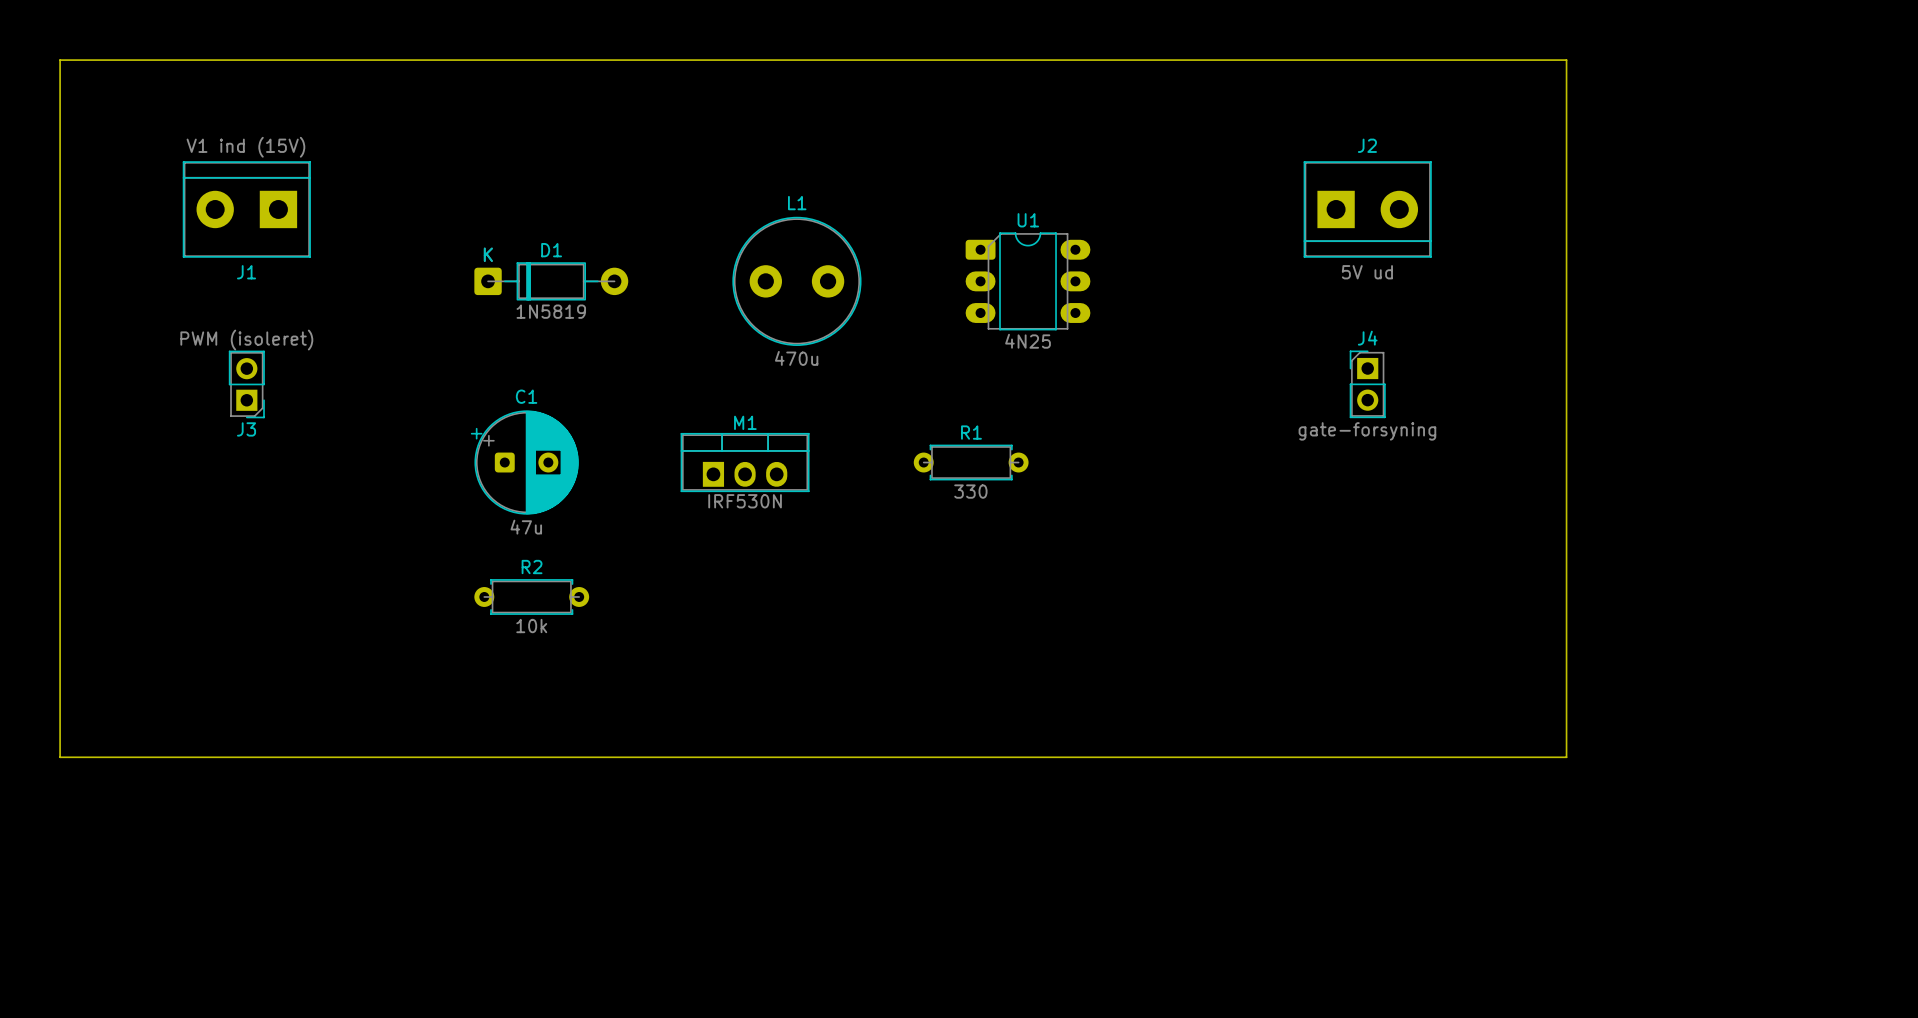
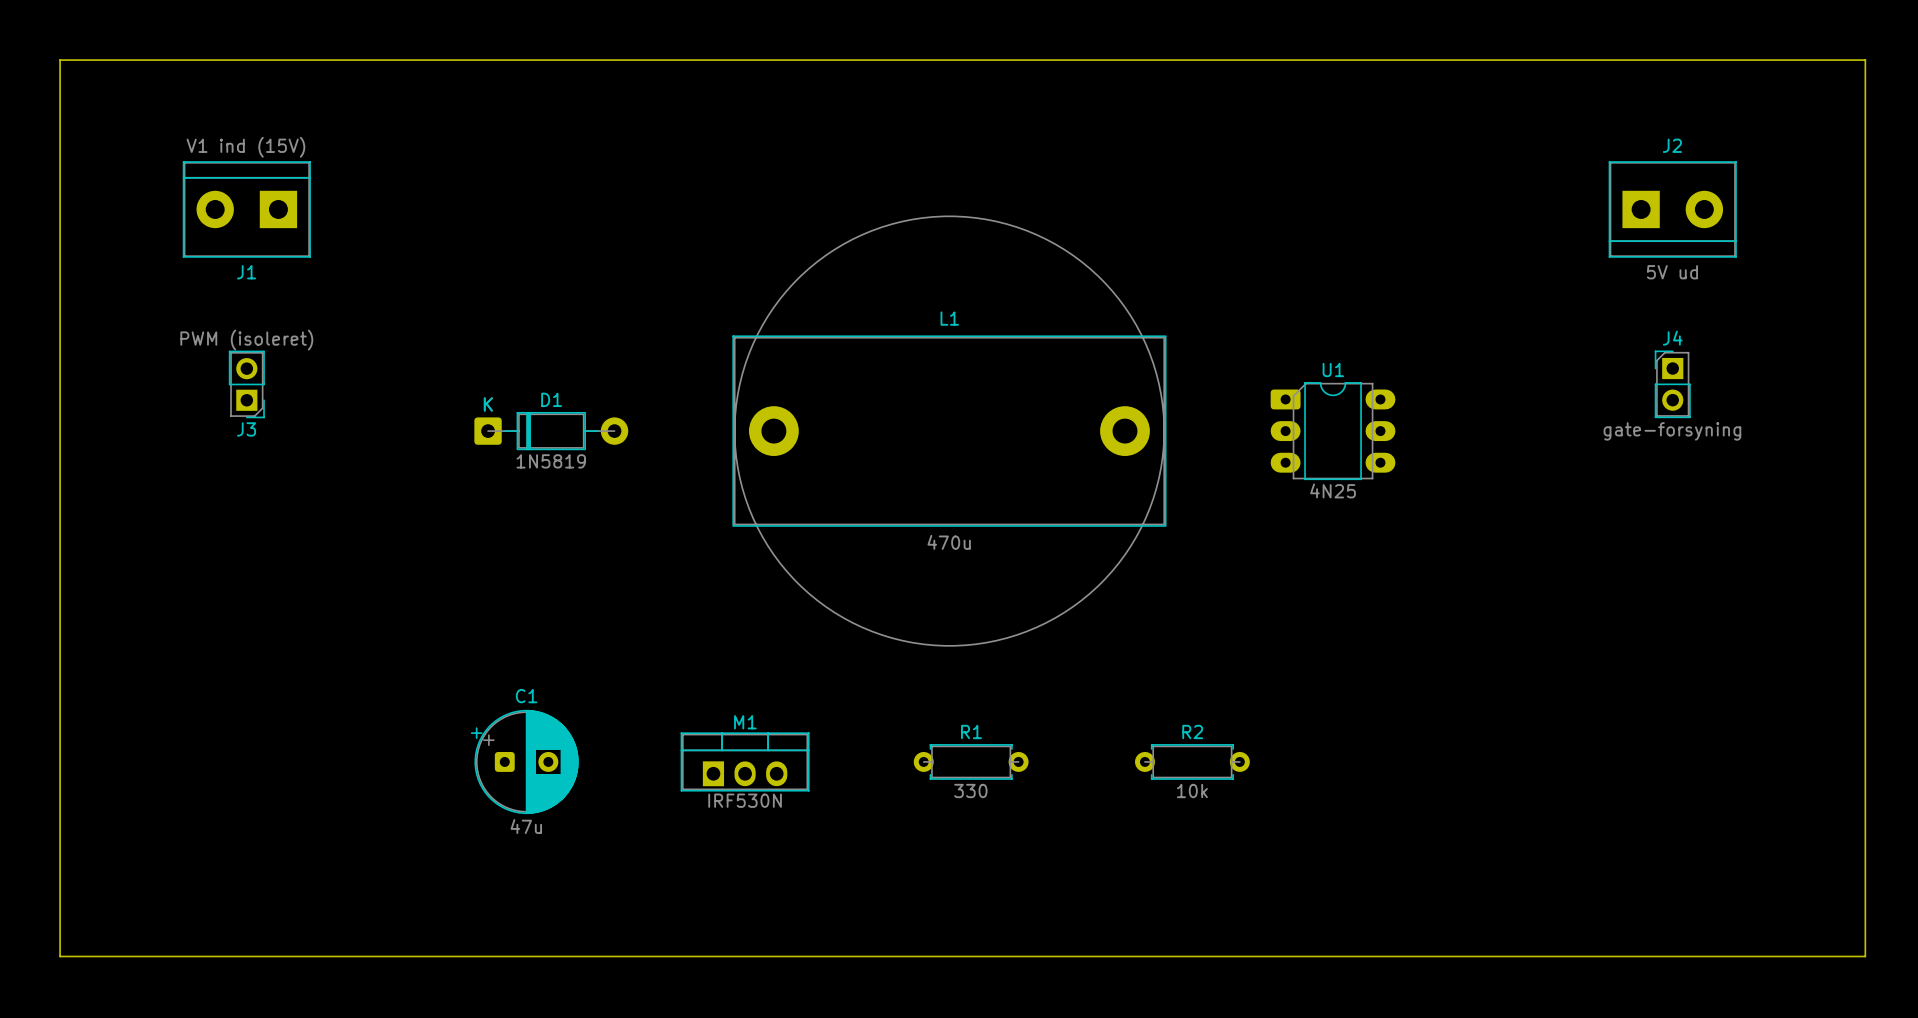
board edge: (1566, 60) (1566, 757) (60, 757) -> (1566, 60) (1865, 60) (1865, 956) (60, 956) (60, 757)
L1 name position: L1 (797, 203) -> L1 (949, 318)
J2 position: (1367, 209) -> (1672, 209)
L1 footprint: [732, 216, 862, 346] -> [732, 215, 1167, 647]
D1 position: (551, 281) -> (551, 431)
U1 position: (1028, 281) -> (1333, 431)
L1 value position: 470u (796, 358) -> 470u (949, 542)
J4 position: (1367, 384) -> (1672, 384)
C1 position: (524, 462) -> (524, 761)
M1 position: (745, 462) -> (745, 761)
R1 position: (971, 462) -> (971, 761)
R2 position: (531, 596) -> (1192, 761)

